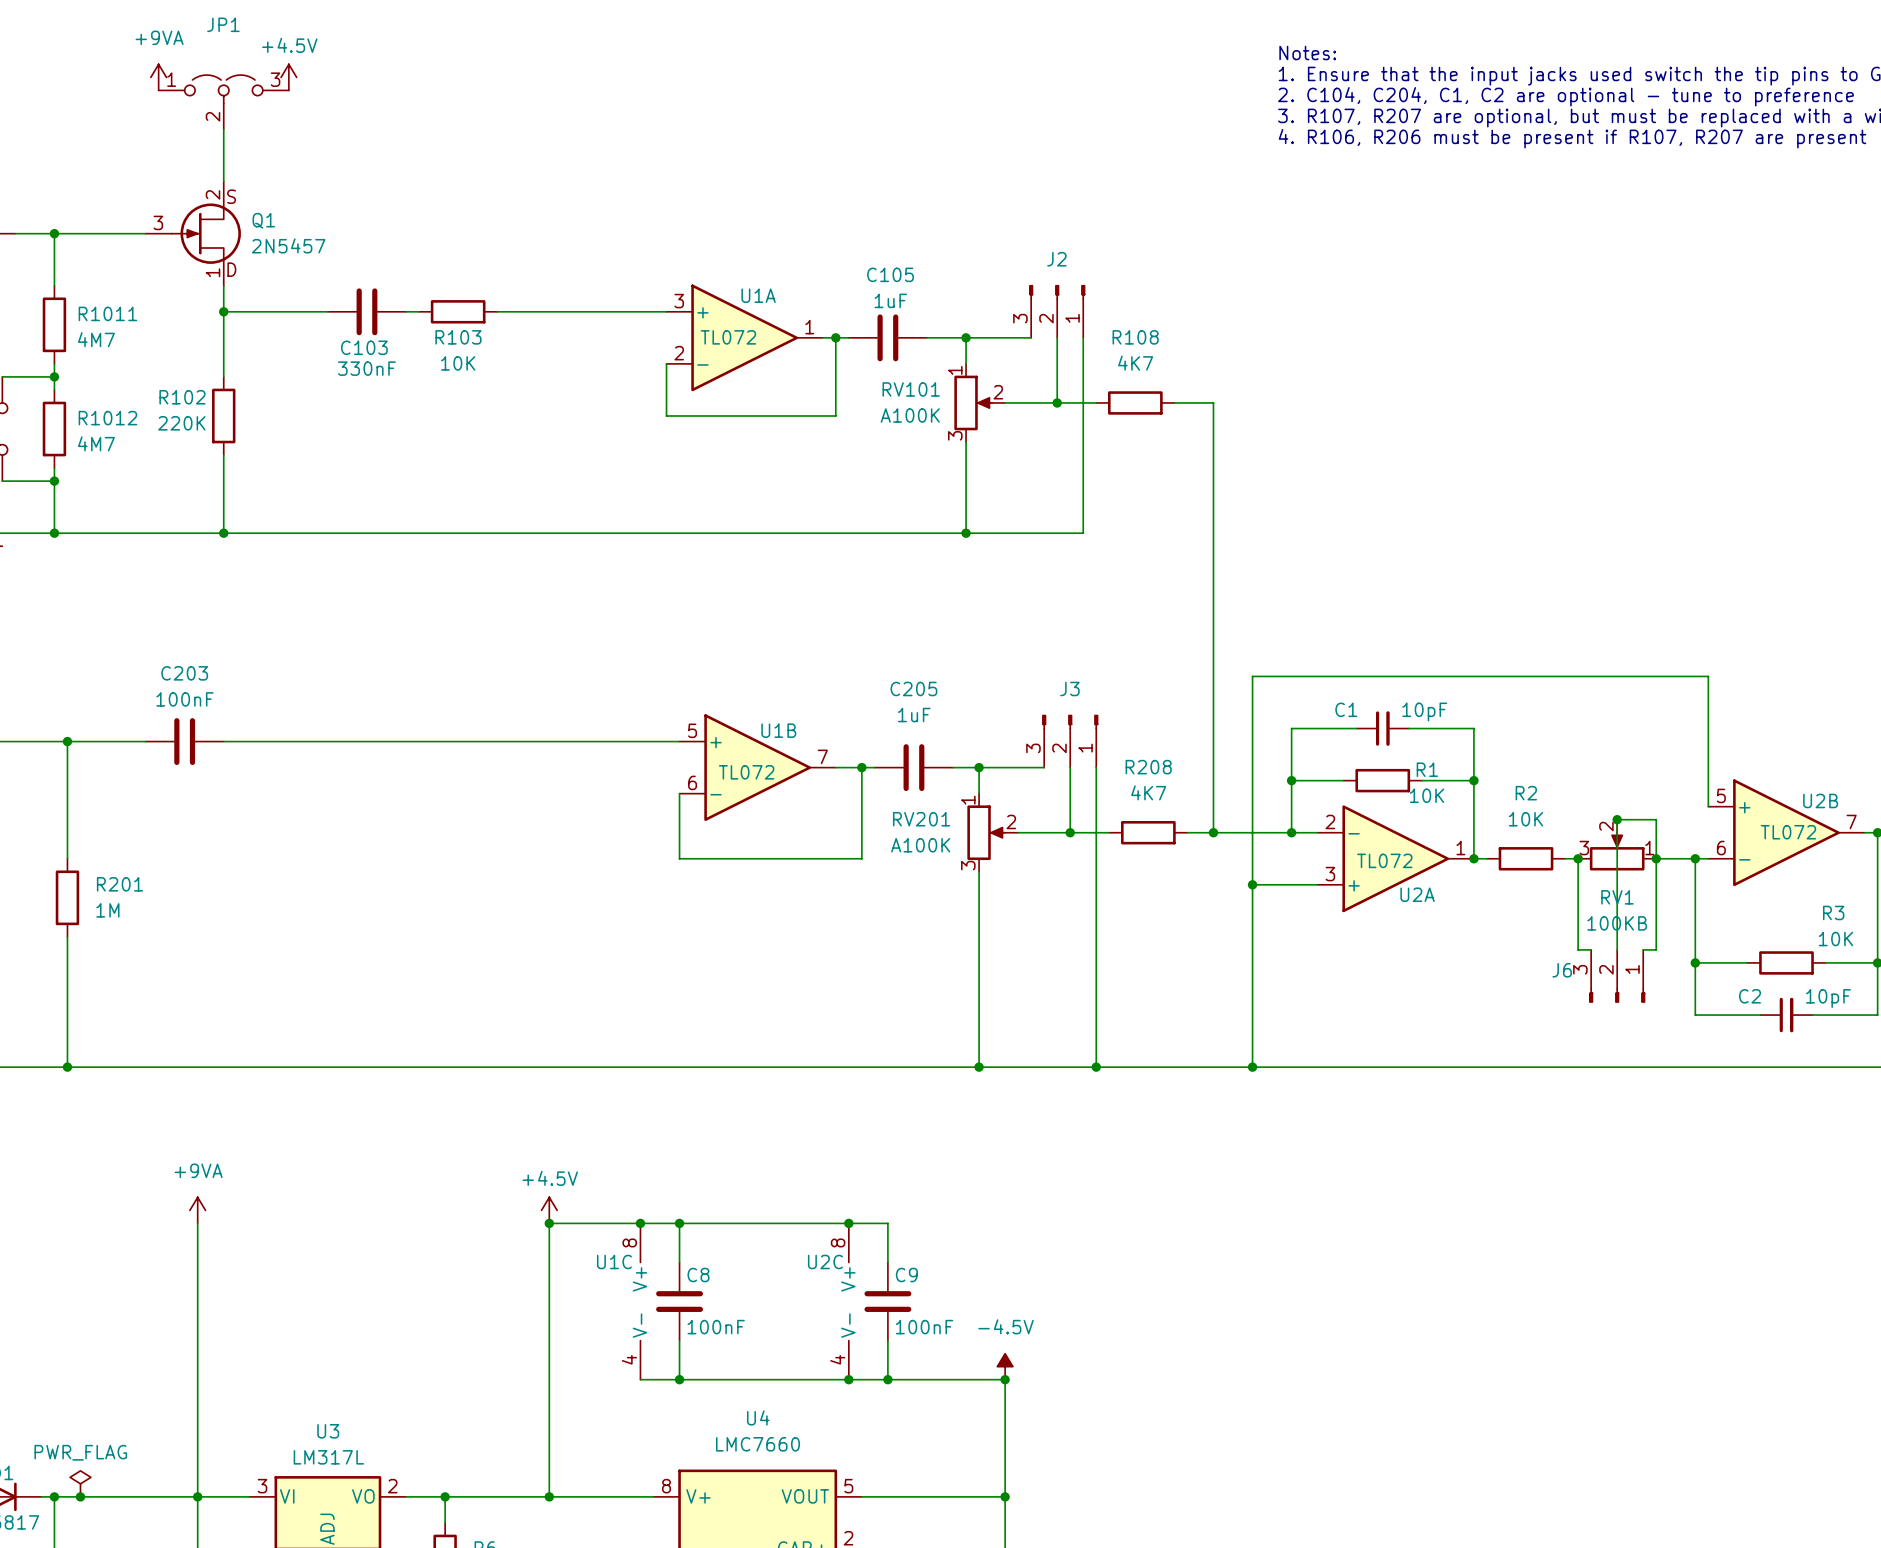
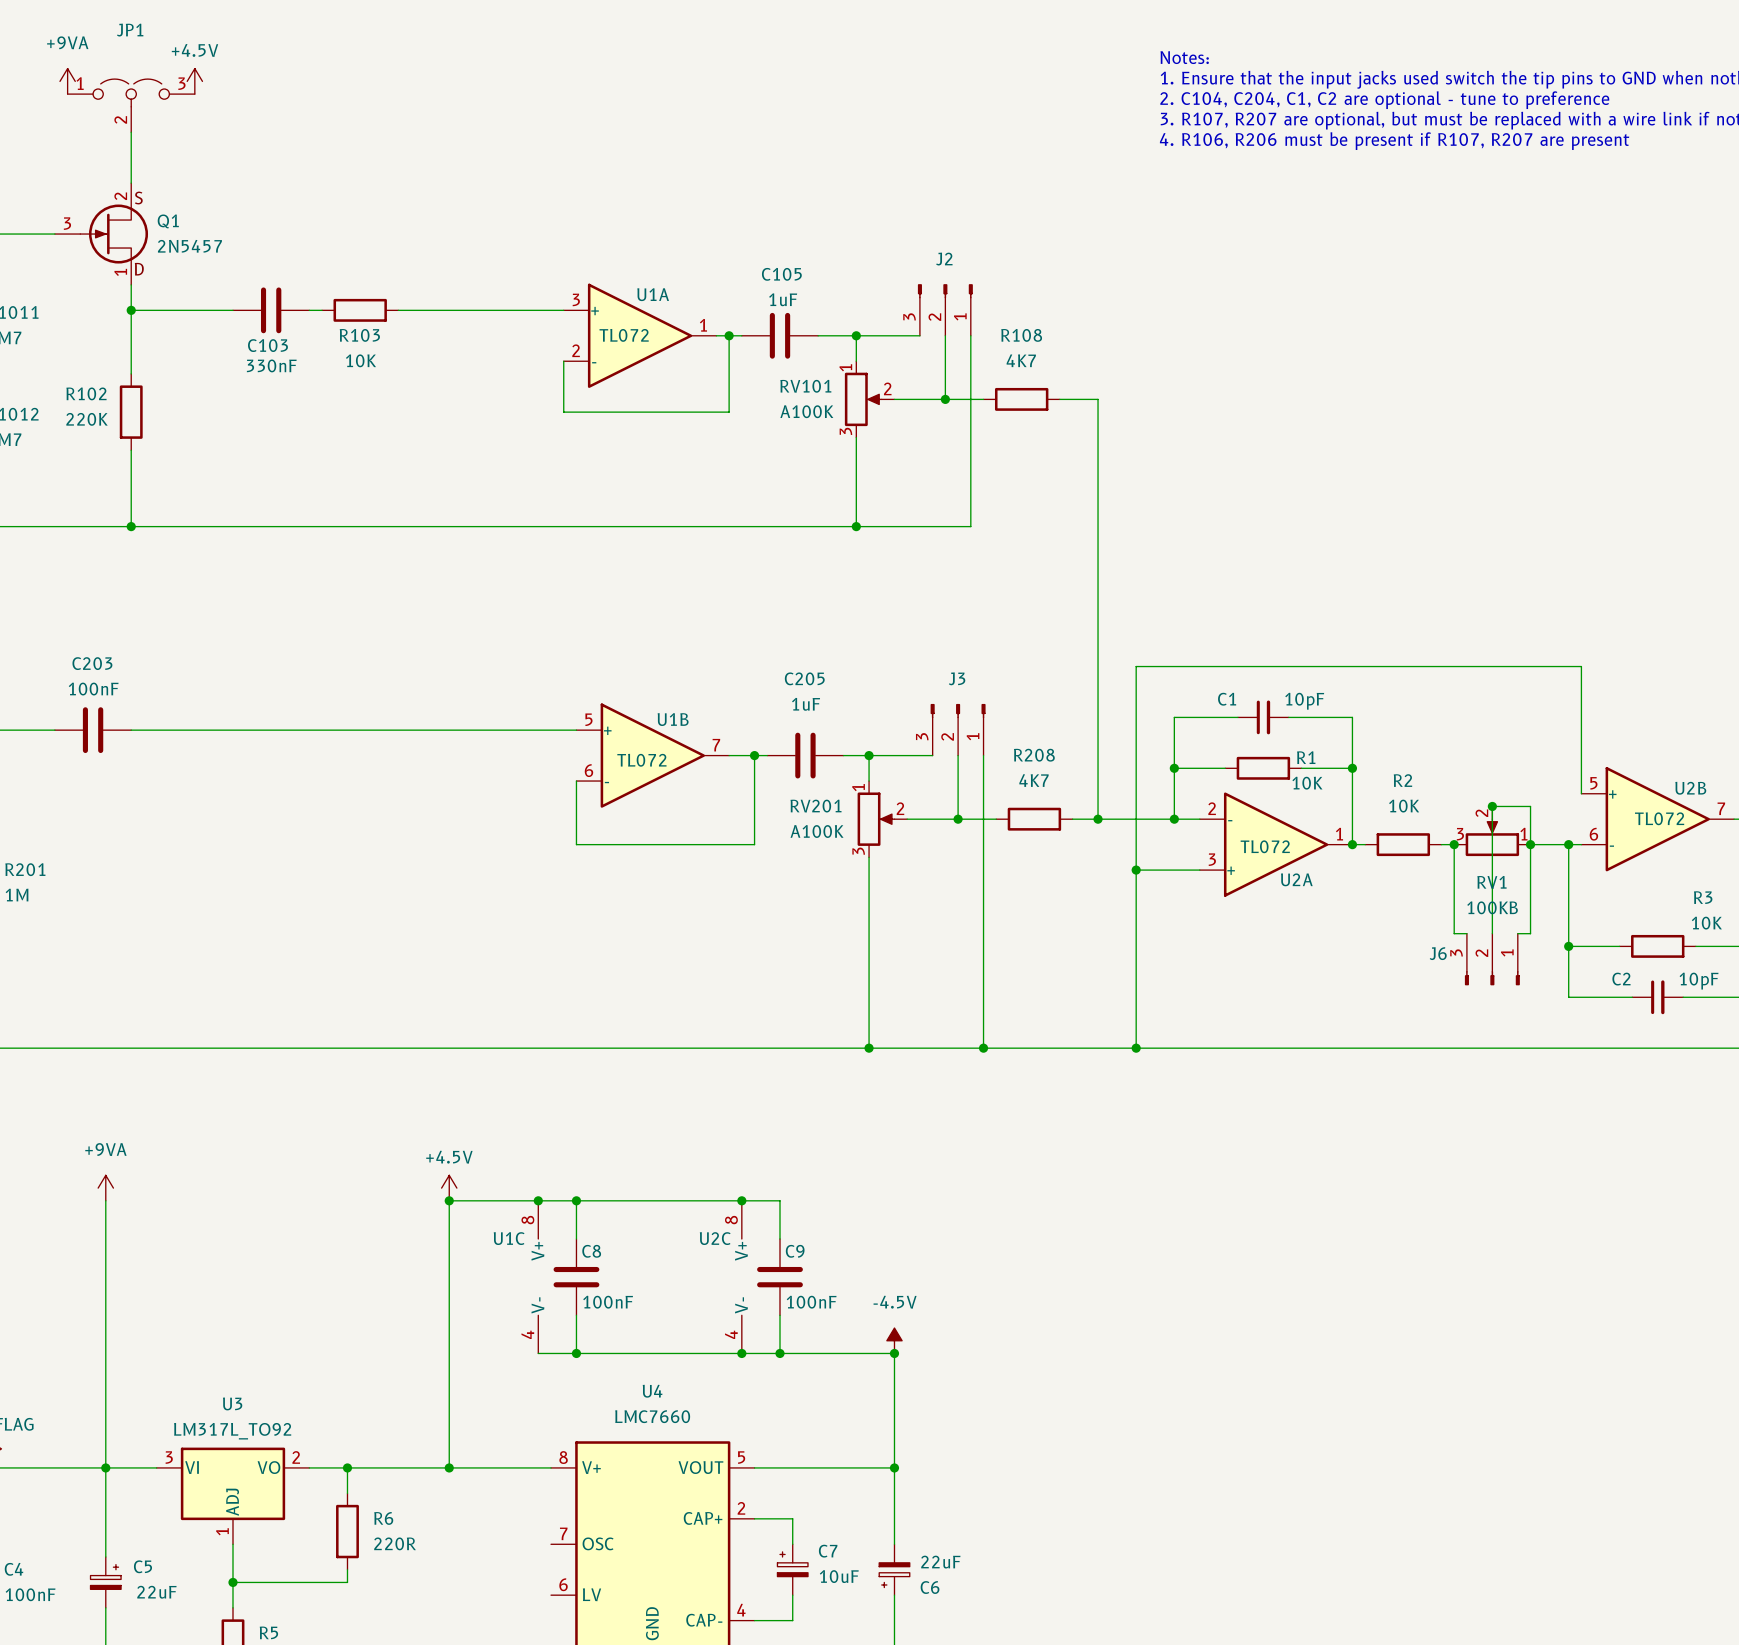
U3 value: LM317L (328, 1457) -> LM317L_TO92 (232, 1431)

